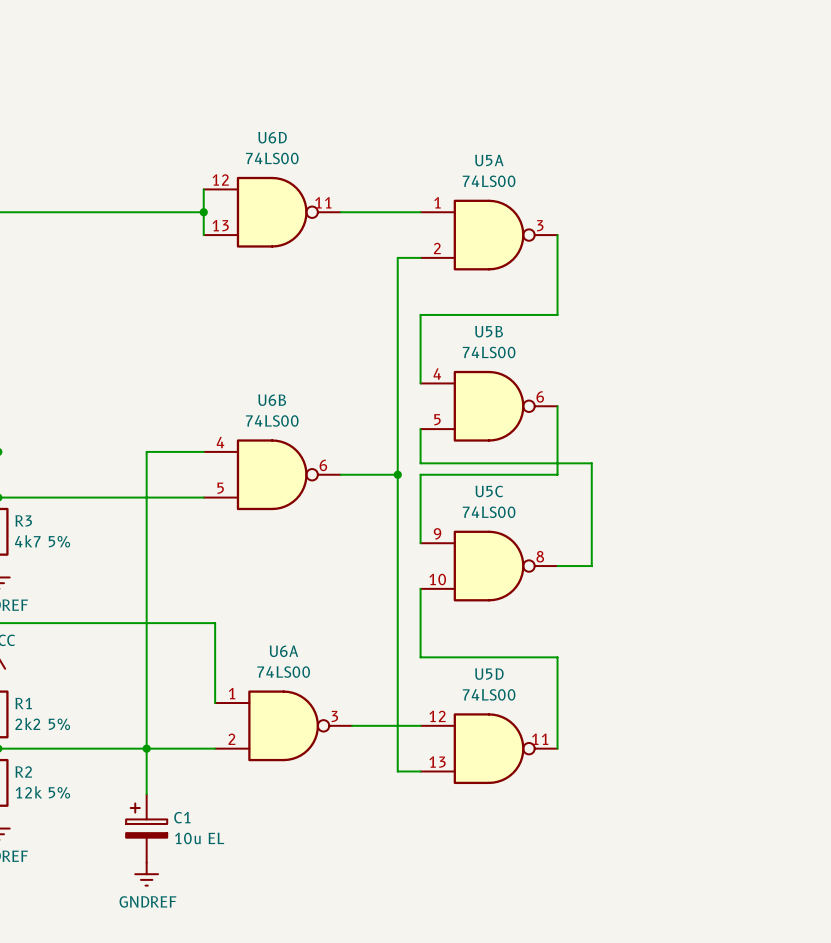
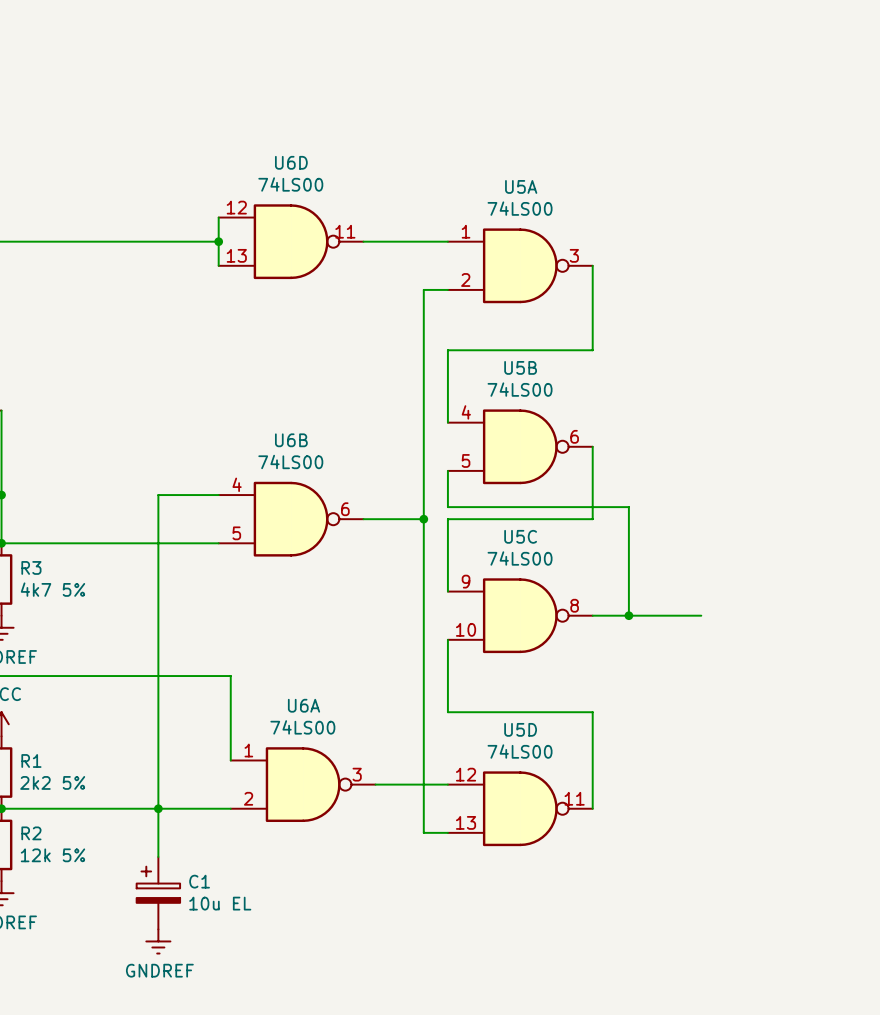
wire: none -> (628, 615) (701, 615)
junction: none -> (628, 615)

